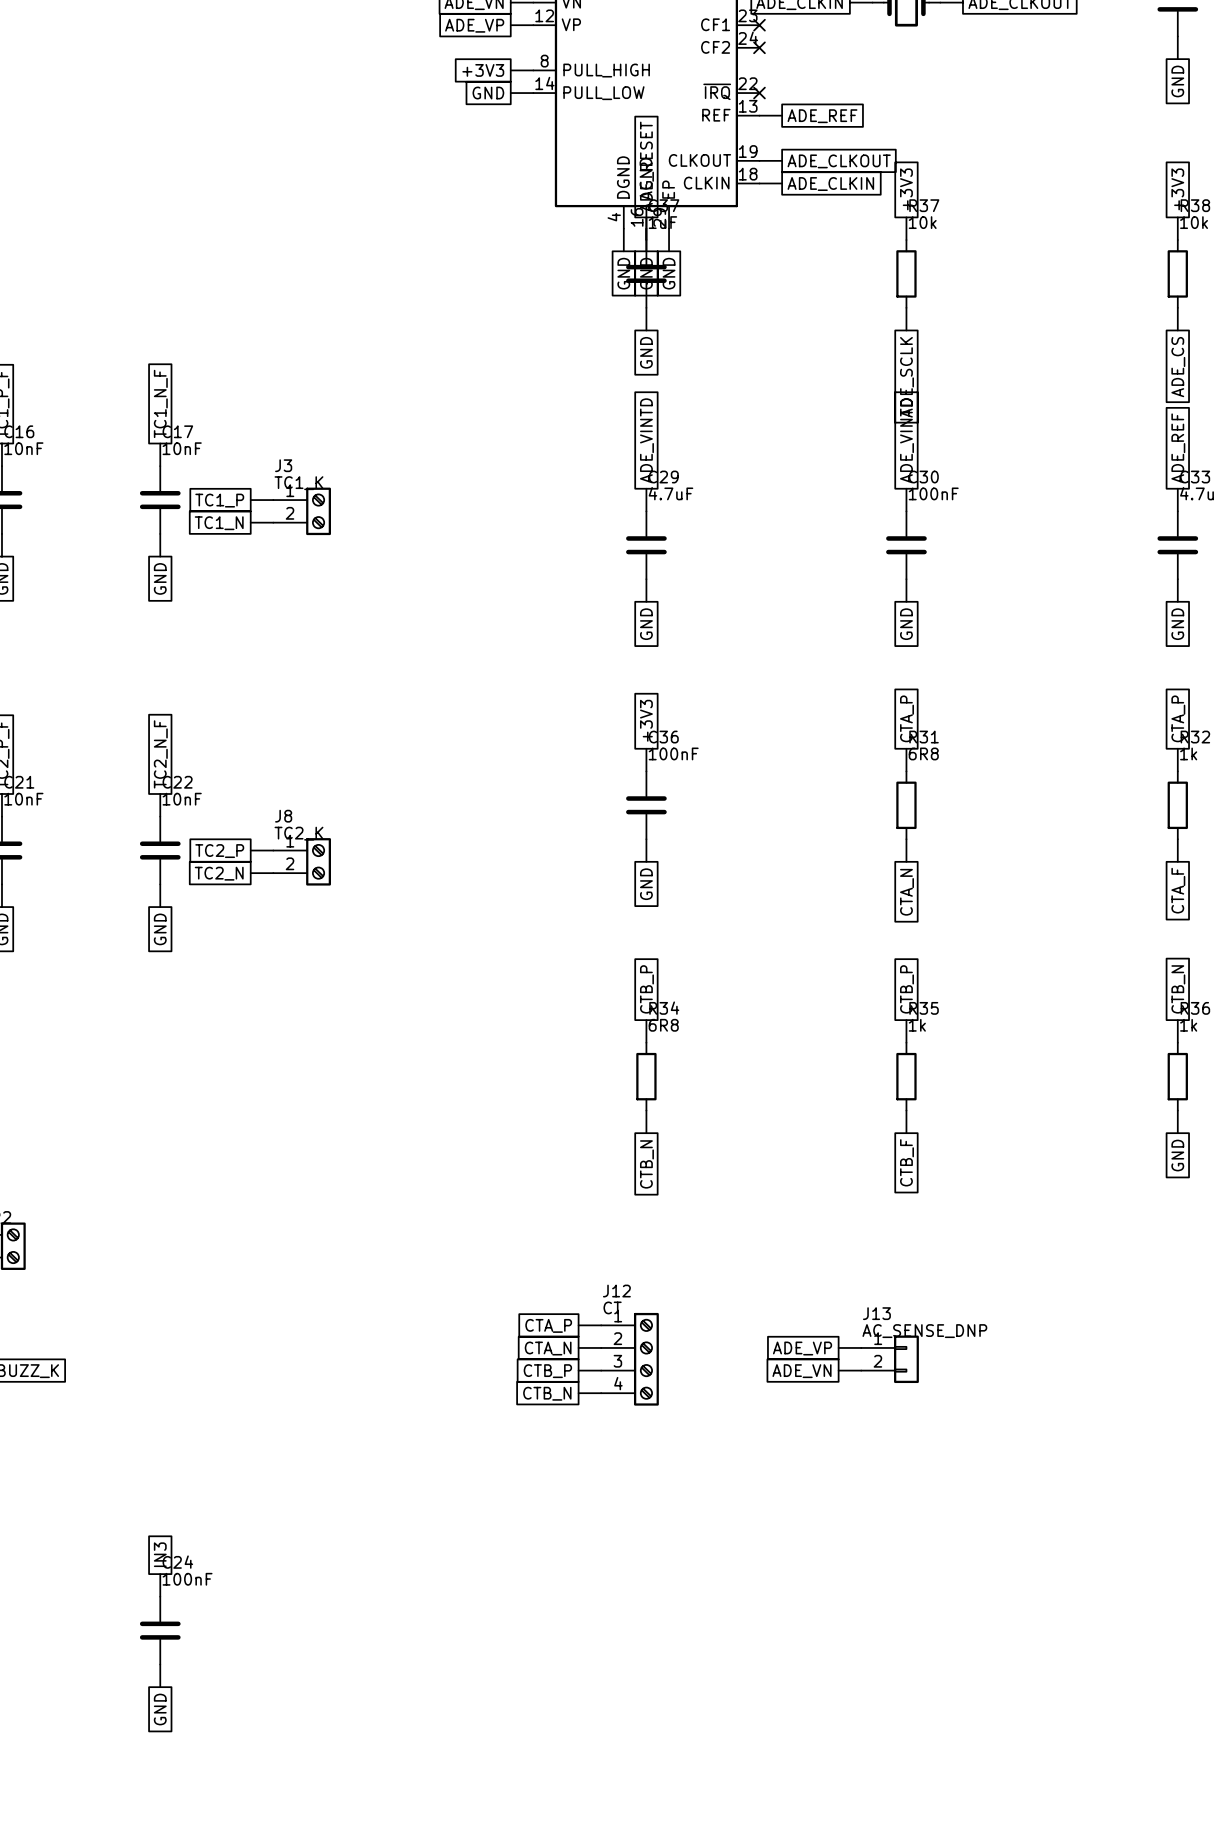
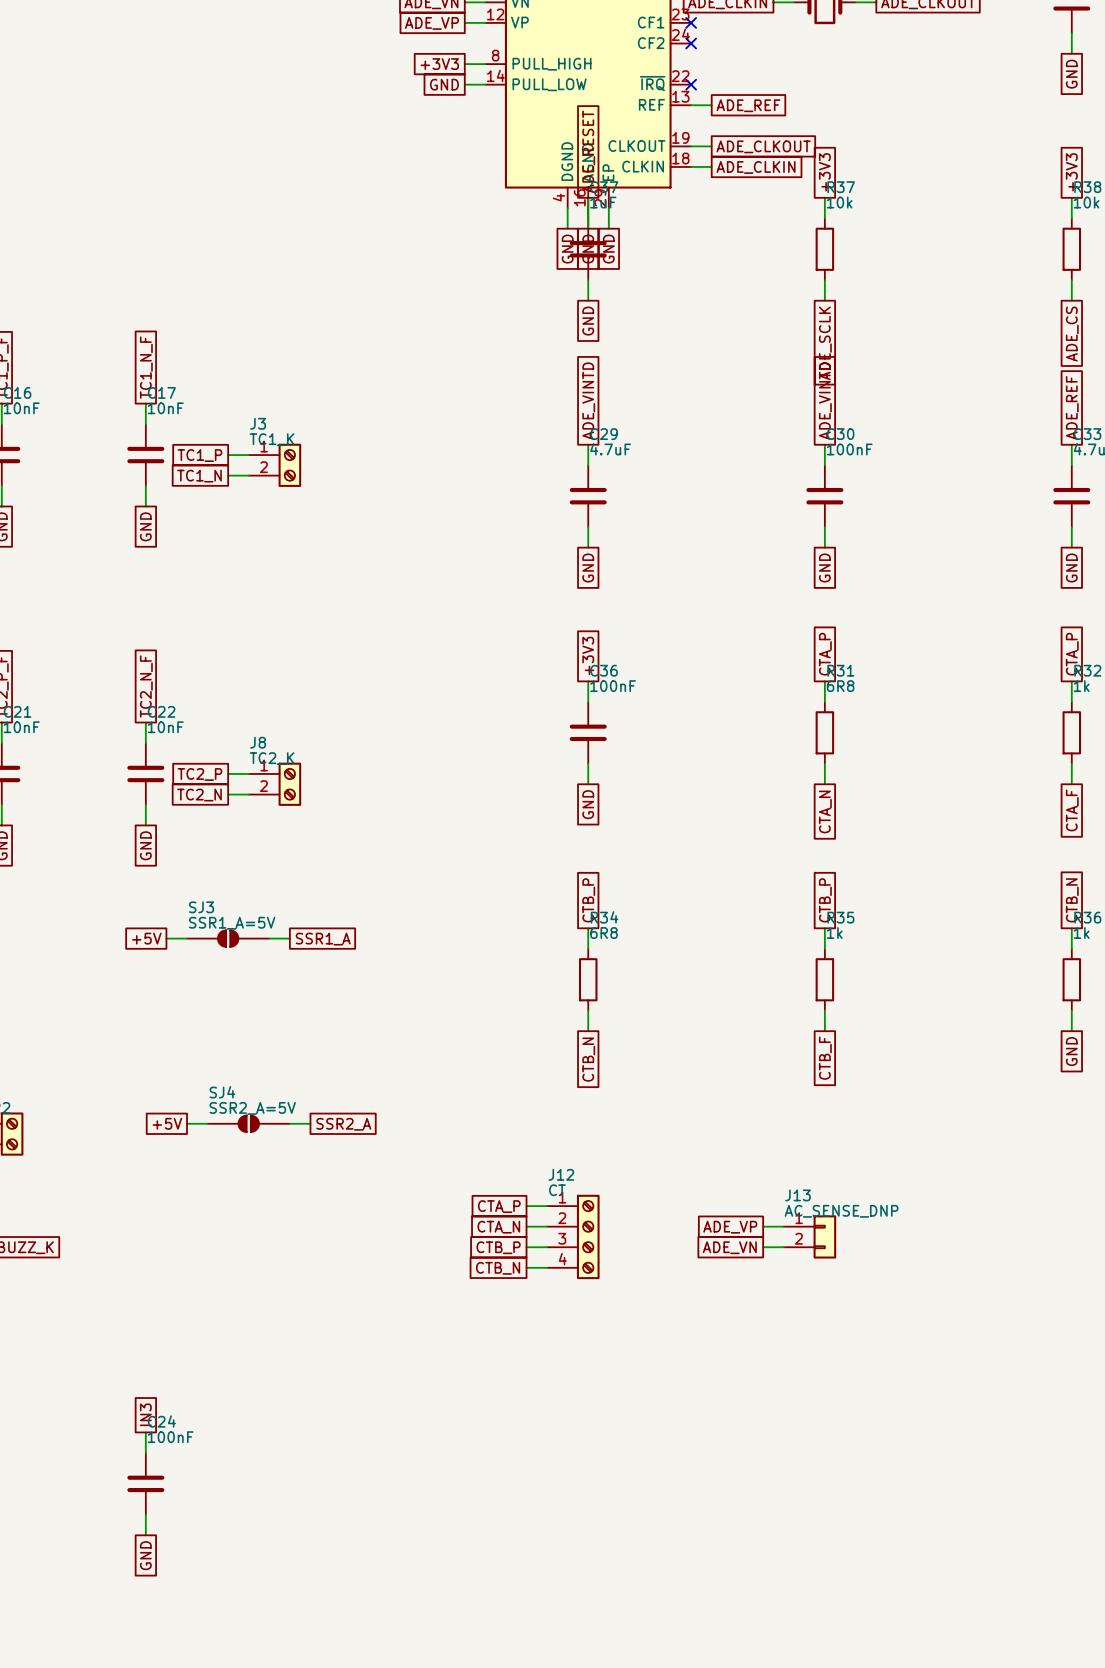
global label: none -> +5V (146, 938)
wire: none -> (166, 938) (187, 938)
SJ3: none -> SSR1_A=5V (228, 938)
wire: none -> (269, 938) (289, 938)
global label: none -> SSR1_A (323, 939)
global label: none -> +5V (167, 1123)
wire: none -> (187, 1123) (207, 1123)
SJ4: none -> SSR2_A=5V (248, 1123)
wire: none -> (289, 1123) (310, 1123)
global label: none -> SSR2_A (343, 1124)

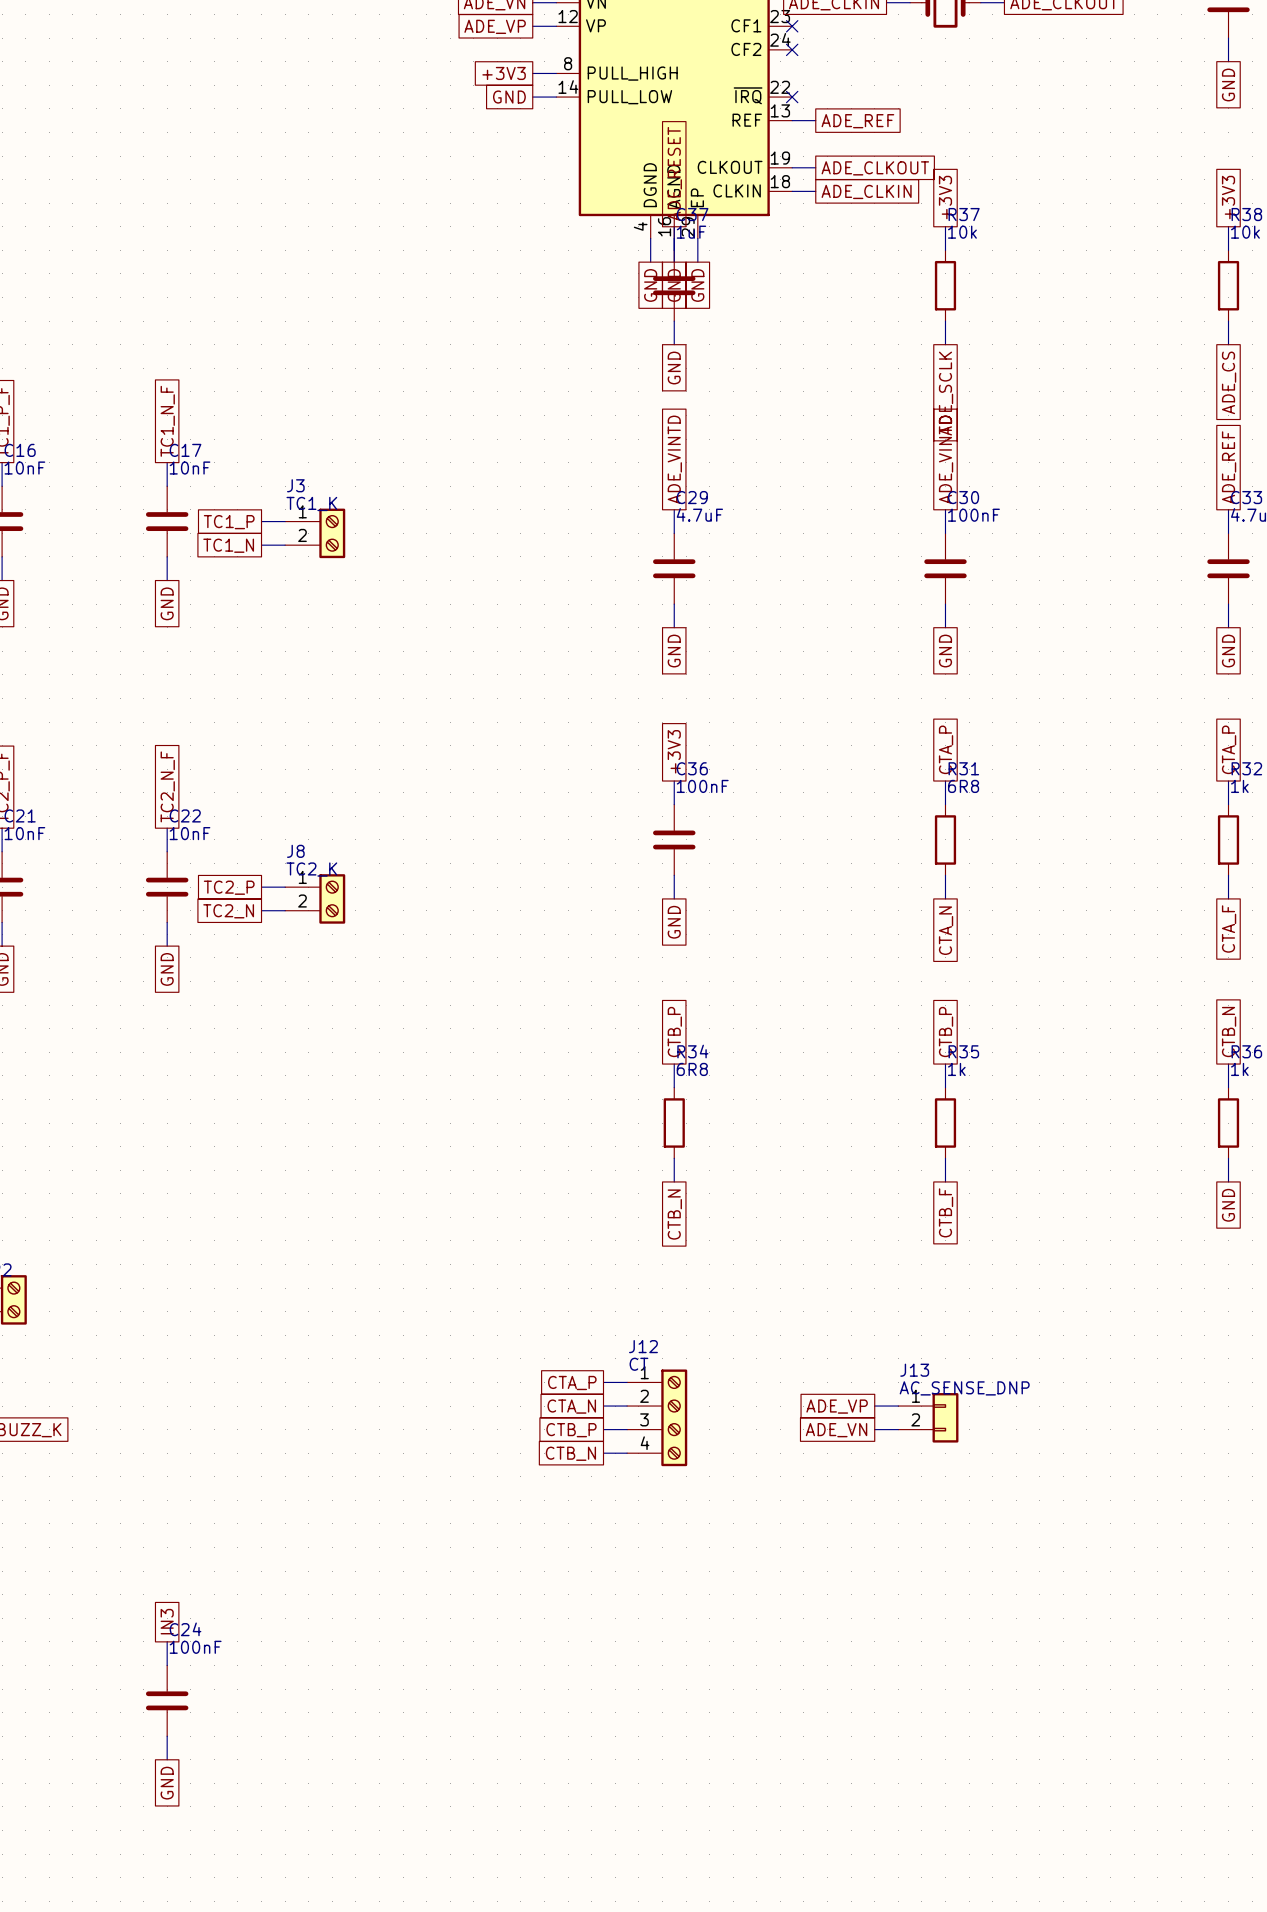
global label: +5V (146, 938) -> none
wire: (166, 938) (187, 938) -> none
SJ3: SSR1_A=5V (228, 938) -> none
wire: (269, 938) (289, 938) -> none
global label: SSR1_A (323, 939) -> none
global label: +5V (167, 1123) -> none
wire: (187, 1123) (207, 1123) -> none
SJ4: SSR2_A=5V (248, 1123) -> none
wire: (289, 1123) (310, 1123) -> none
global label: SSR2_A (343, 1124) -> none

